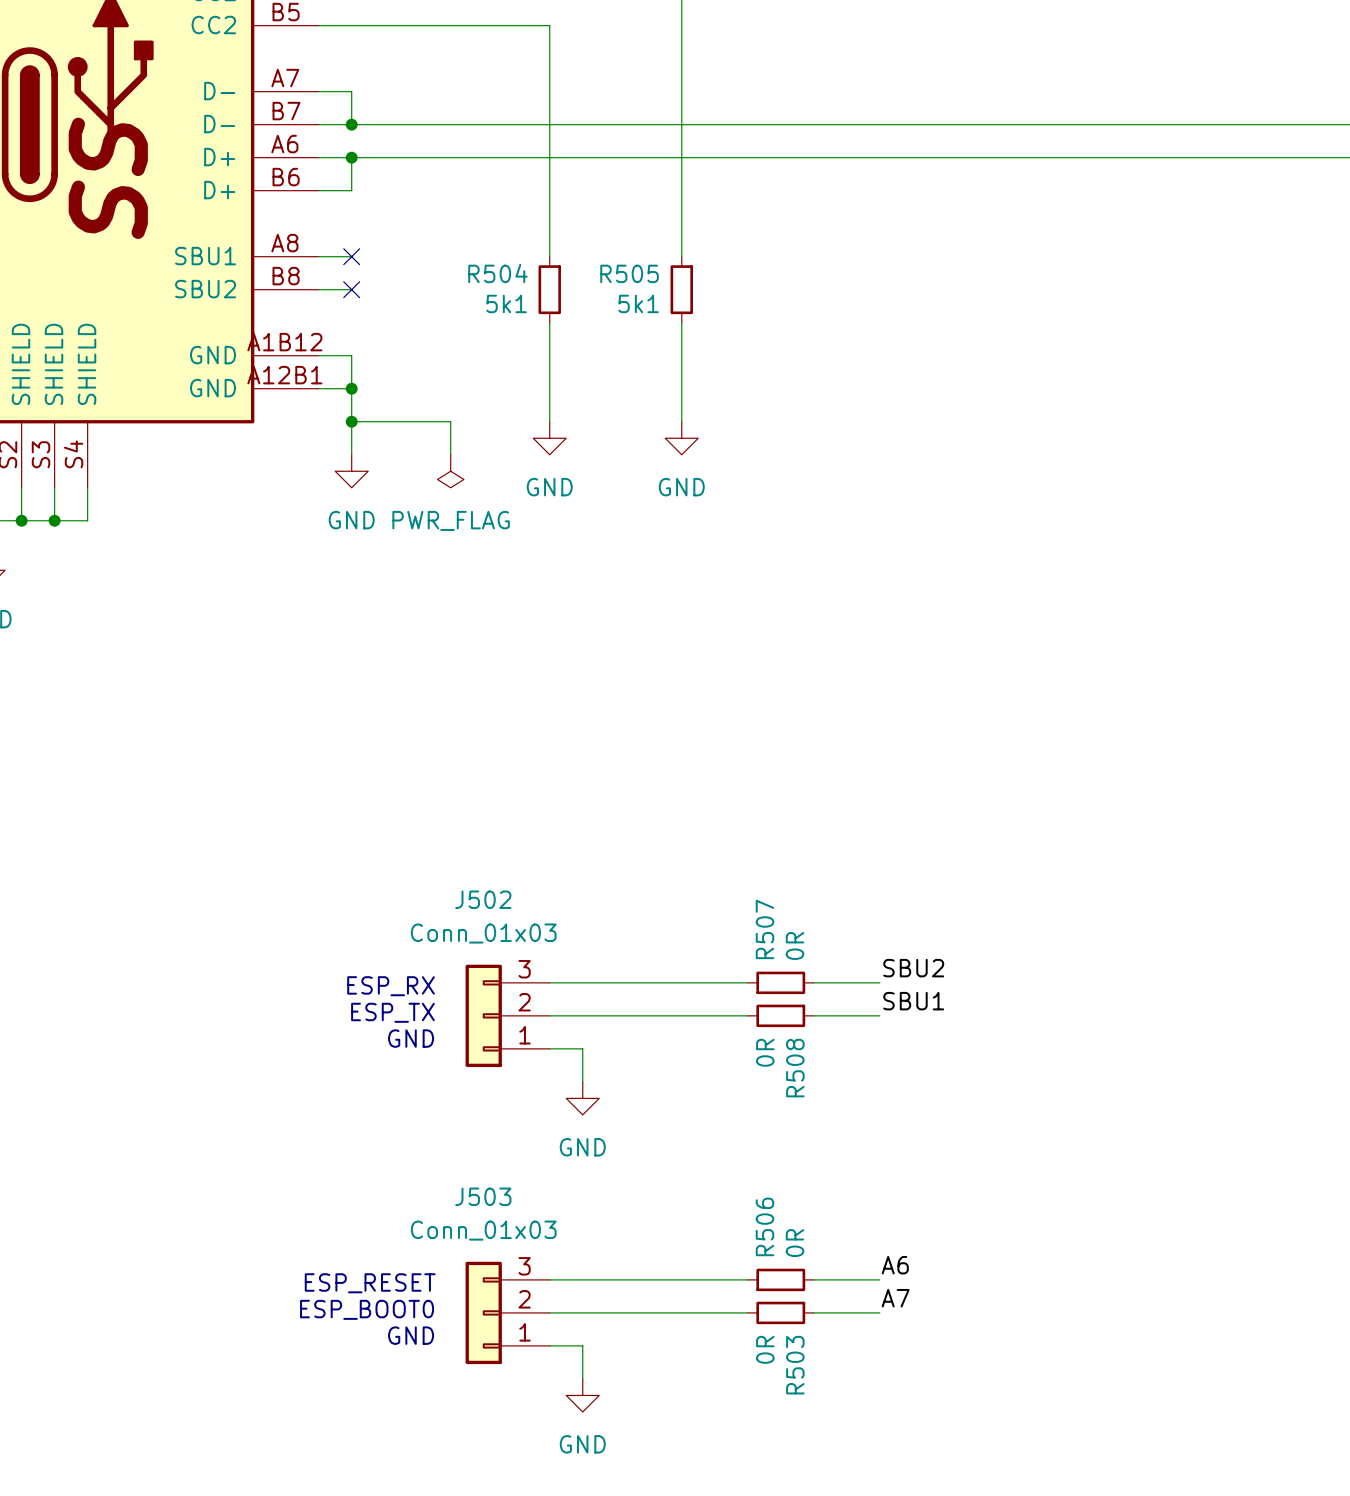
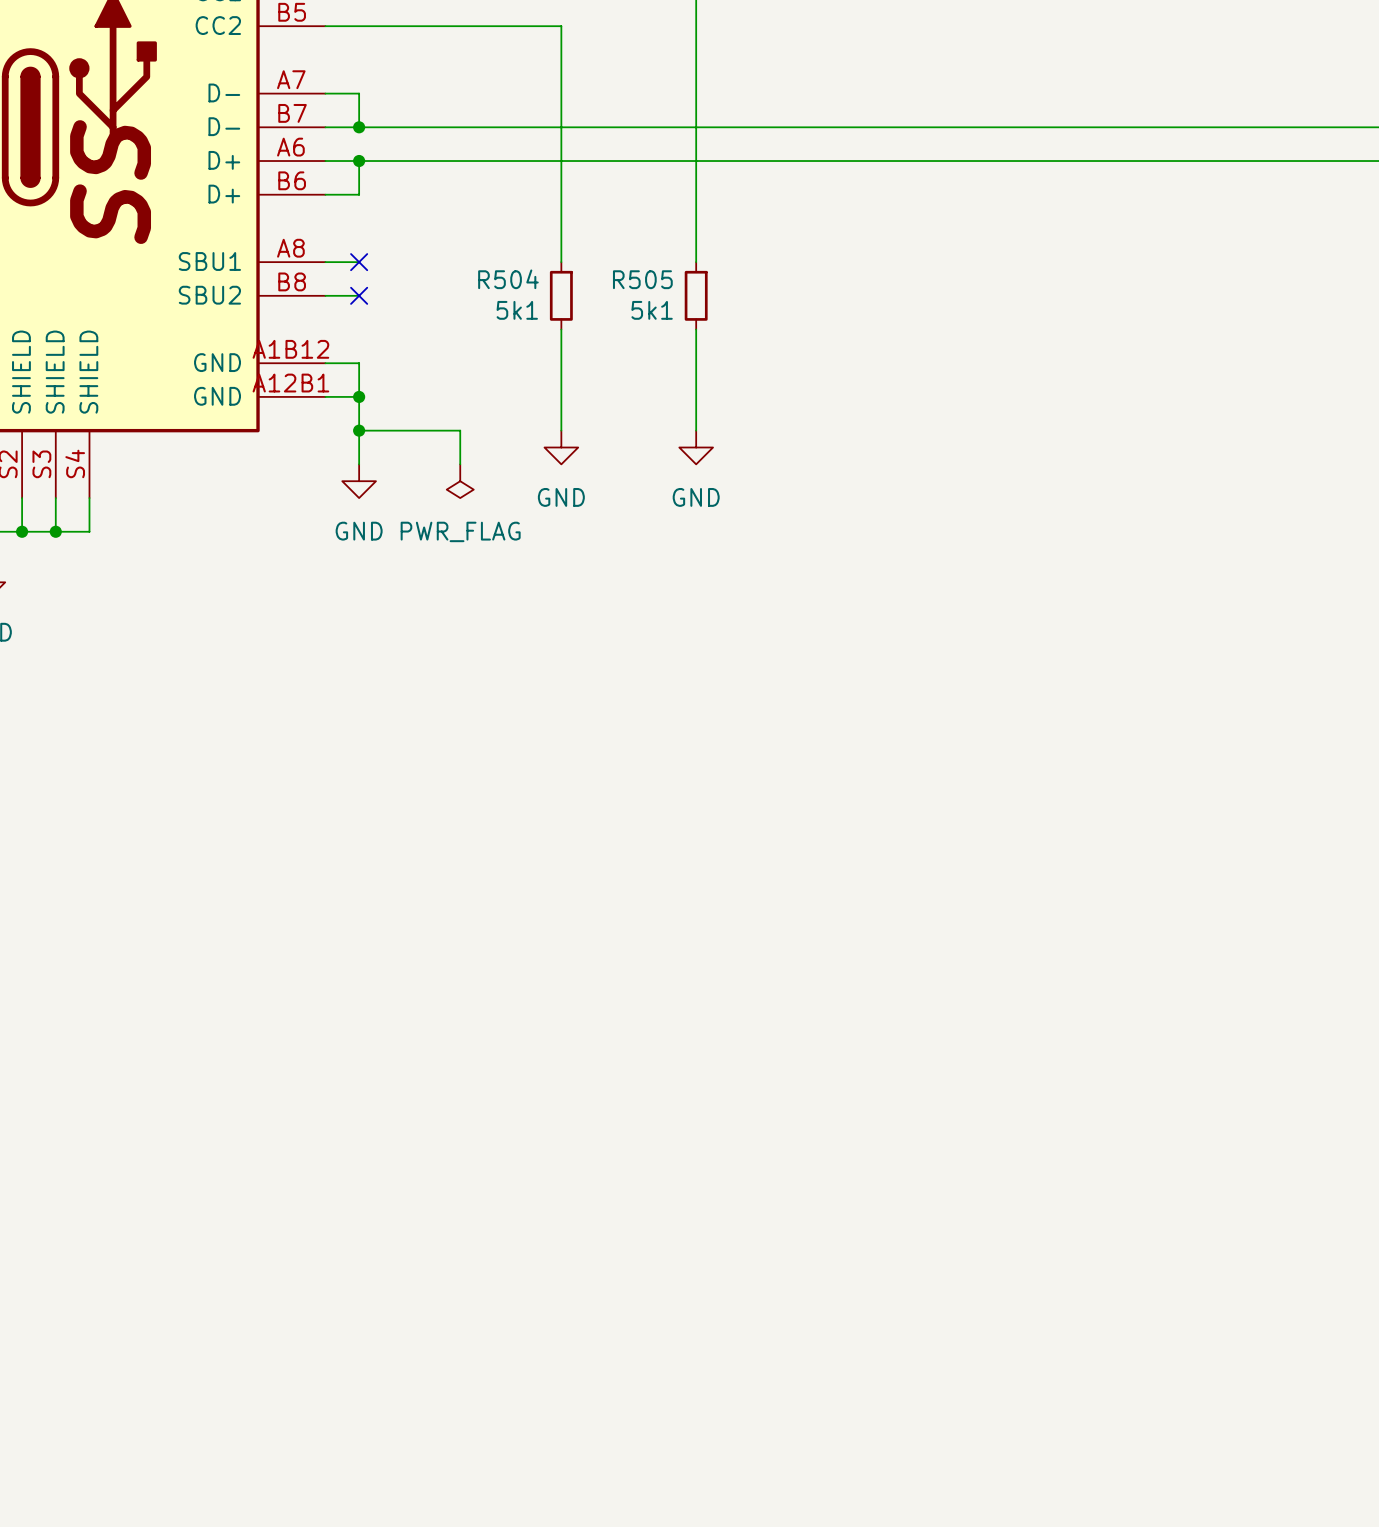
label: SBU2 (913, 968) -> none
wire: (549, 982) (747, 982) -> none
R507: 0R (780, 982) -> none
wire: (813, 982) (879, 982) -> none
text: ESP_RX (391, 986) -> none
label: SBU1 (913, 1001) -> none
text: ESP_TX (392, 1012) -> none
J502: Conn_01x03 (507, 1015) -> none
wire: (549, 1015) (747, 1015) -> none
R508: 0R (780, 1015) -> none
wire: (813, 1015) (879, 1015) -> none
text: GND (411, 1038) -> none
wire: (549, 1048) (582, 1048) (582, 1081) -> none
power symbol: GND (582, 1098) -> none
label: A6 (895, 1265) -> none
wire: (549, 1279) (747, 1279) -> none
R506: 0R (780, 1279) -> none
wire: (813, 1279) (879, 1279) -> none
text: ESP_RESET (370, 1283) -> none
label: A7 (895, 1298) -> none
text: ESP_BOOT0 (367, 1309) -> none
J503: Conn_01x03 (507, 1312) -> none
wire: (549, 1312) (747, 1312) -> none
R503: 0R (780, 1312) -> none
wire: (813, 1312) (879, 1312) -> none
text: GND (411, 1335) -> none
wire: (549, 1345) (582, 1345) (582, 1378) -> none
power symbol: GND (582, 1395) -> none

